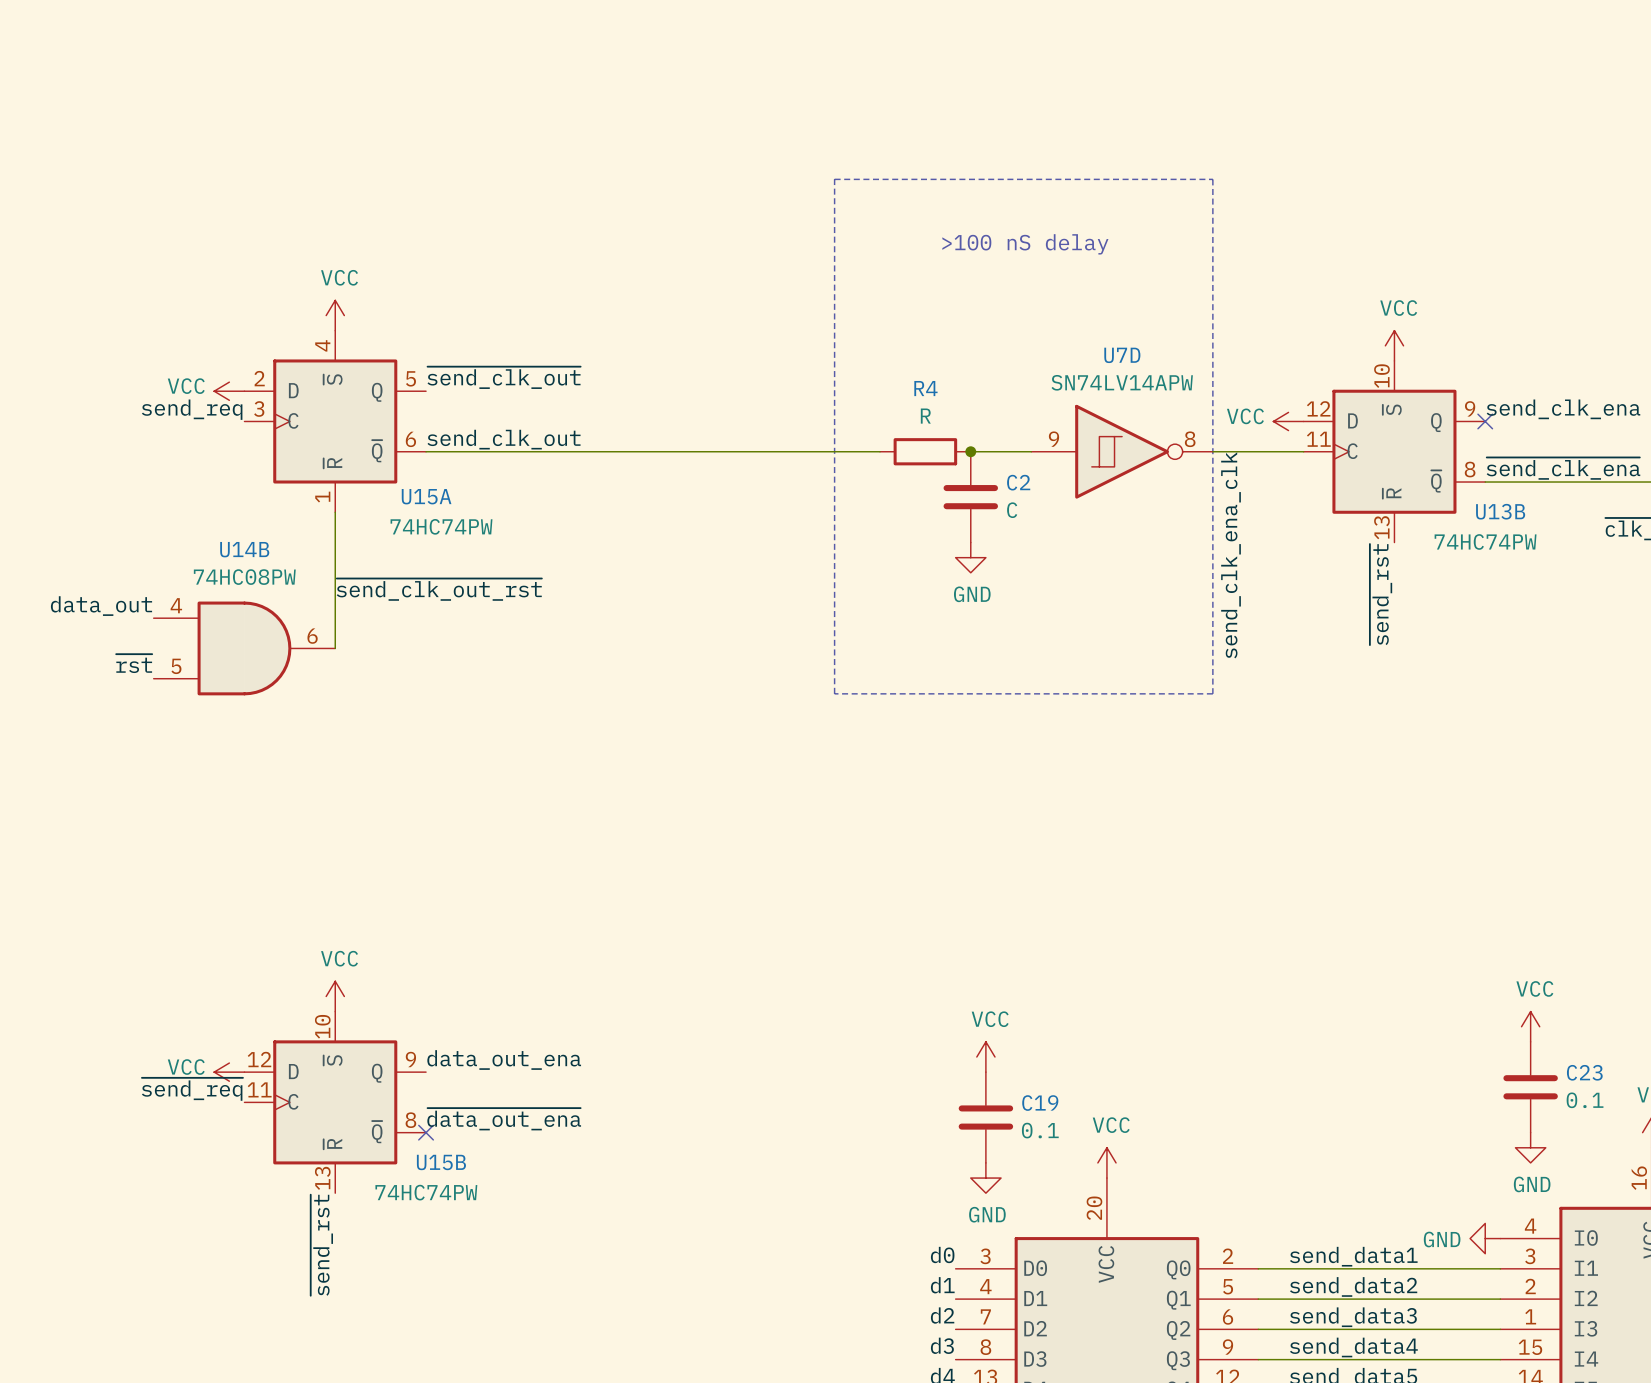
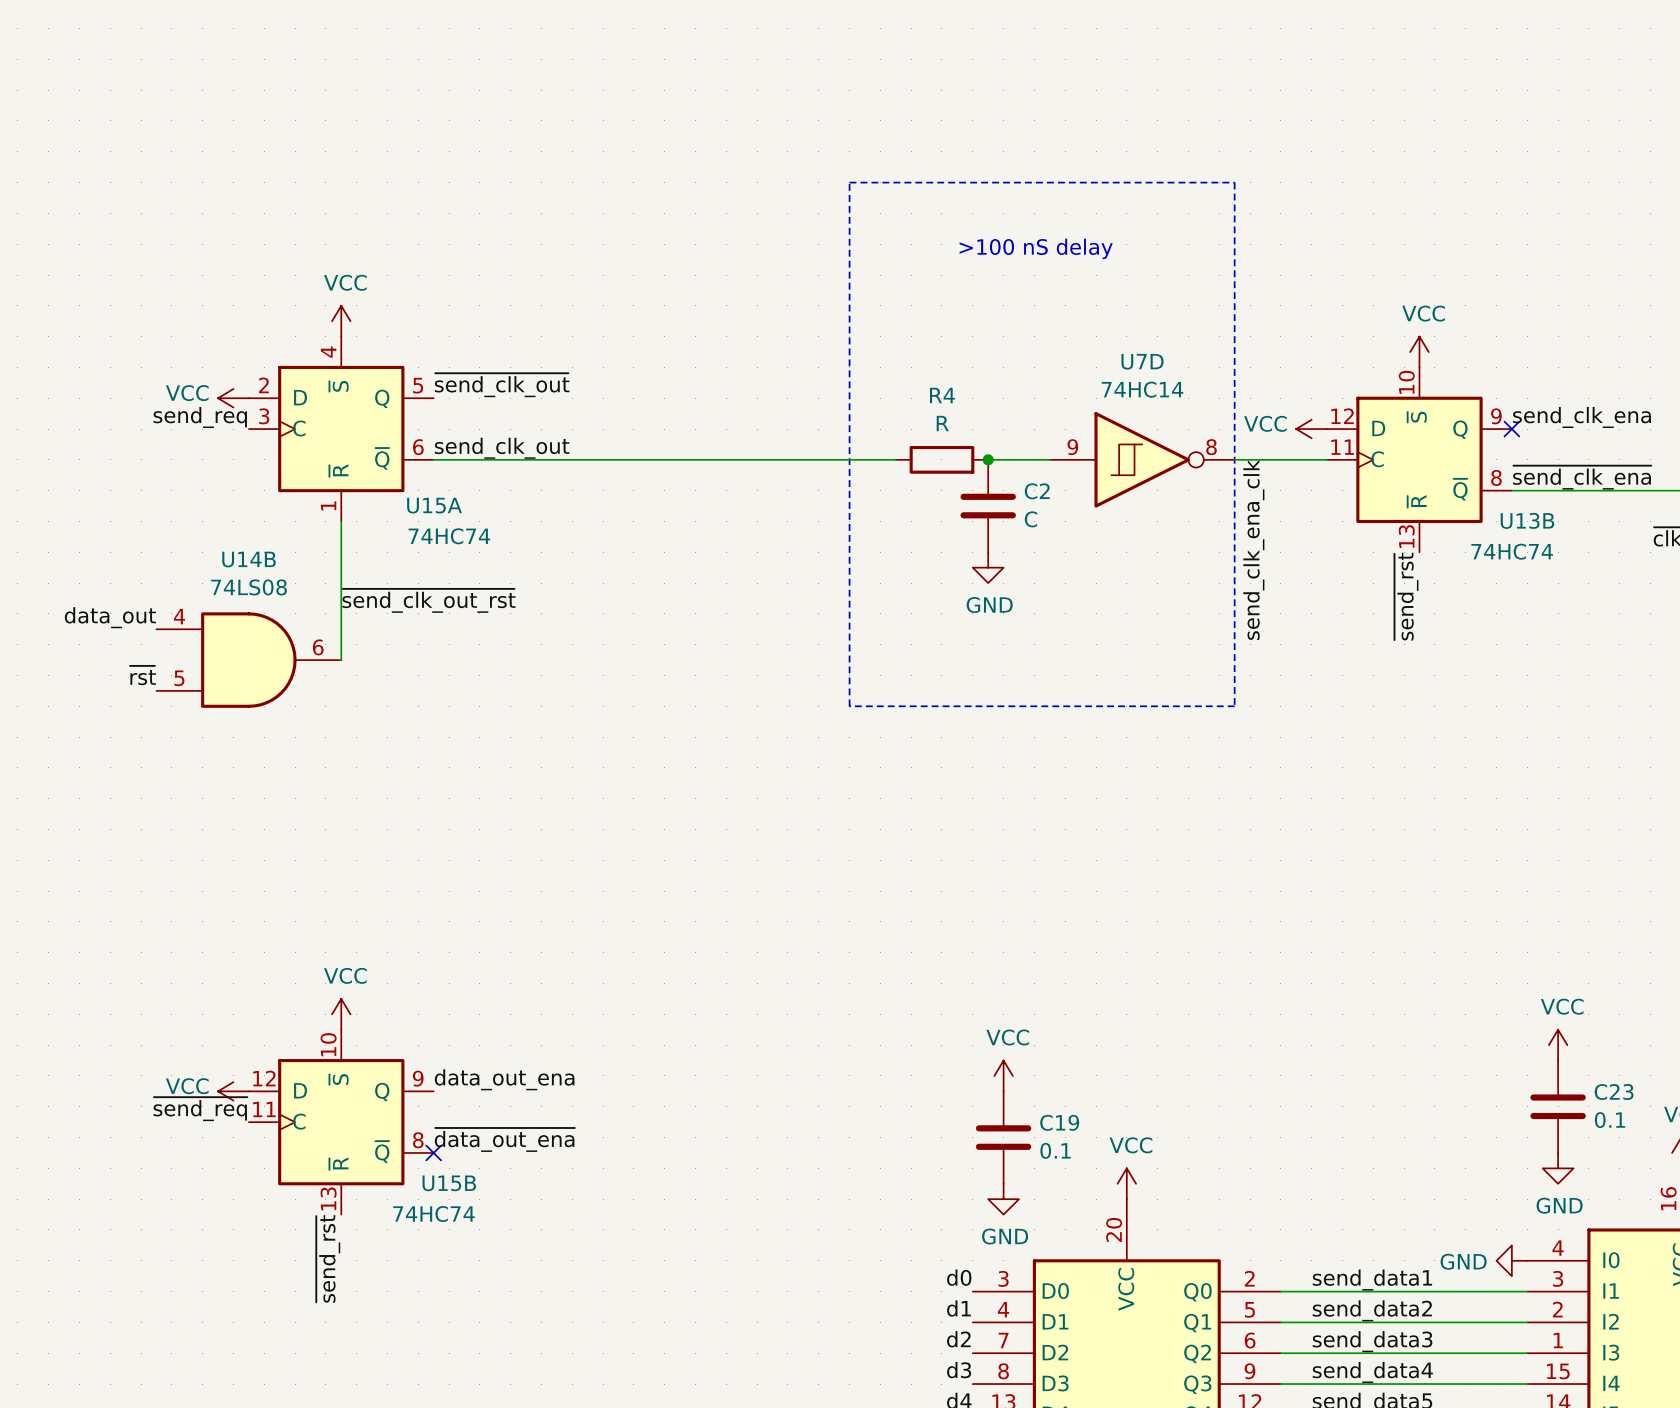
U7D value: SN74LV14APW (1122, 382) -> 74HC14 (1142, 389)
U15A value: 74HC74PW (441, 526) -> 74HC74 (449, 536)
U13B value: 74HC74PW (1485, 541) -> 74HC74 (1512, 551)
U14B value: 74HC08PW (244, 577) -> 74LS08 (249, 587)
U15B value: 74HC74PW (426, 1192) -> 74HC74 (433, 1214)

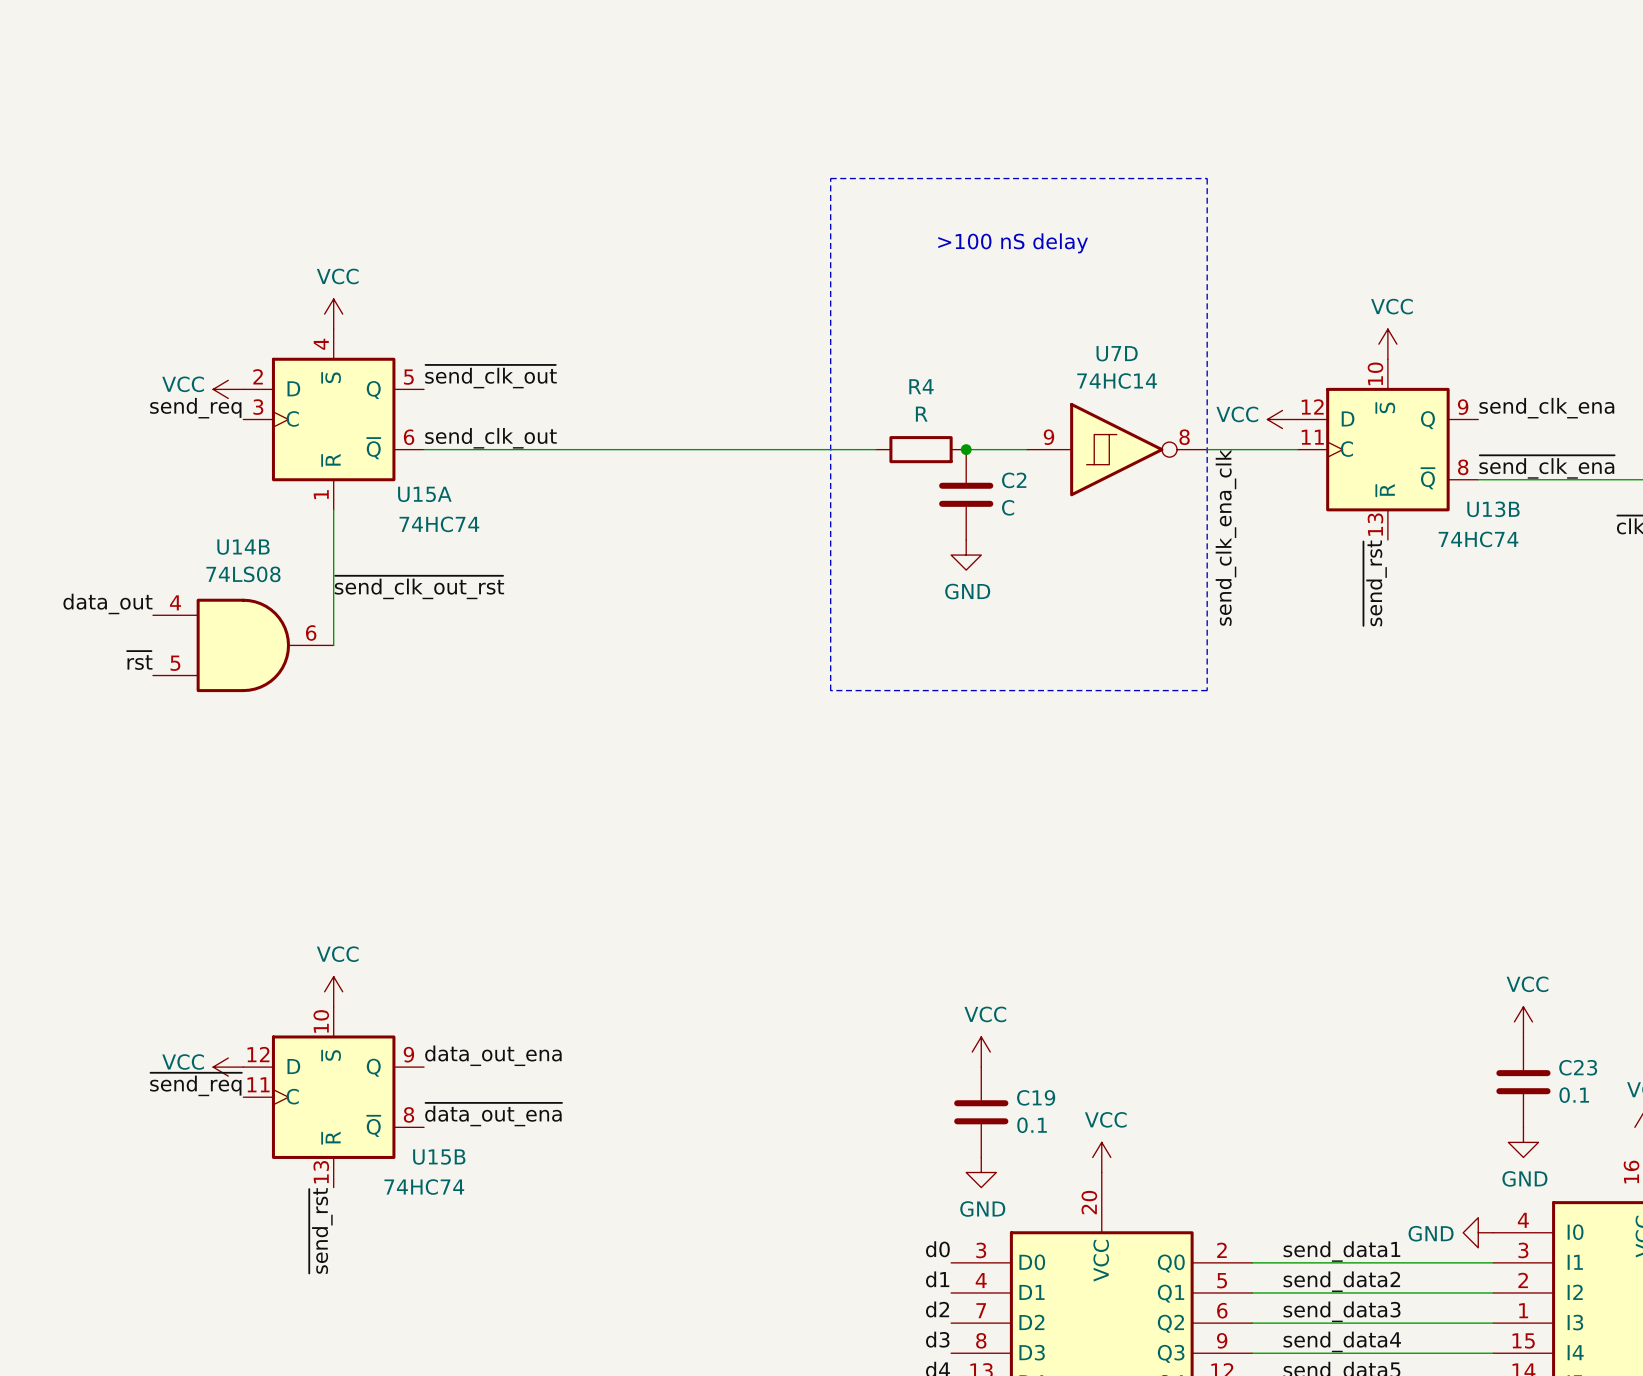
no-connect mark: (1511, 429) -> none
no-connect mark: (433, 1152) -> none

